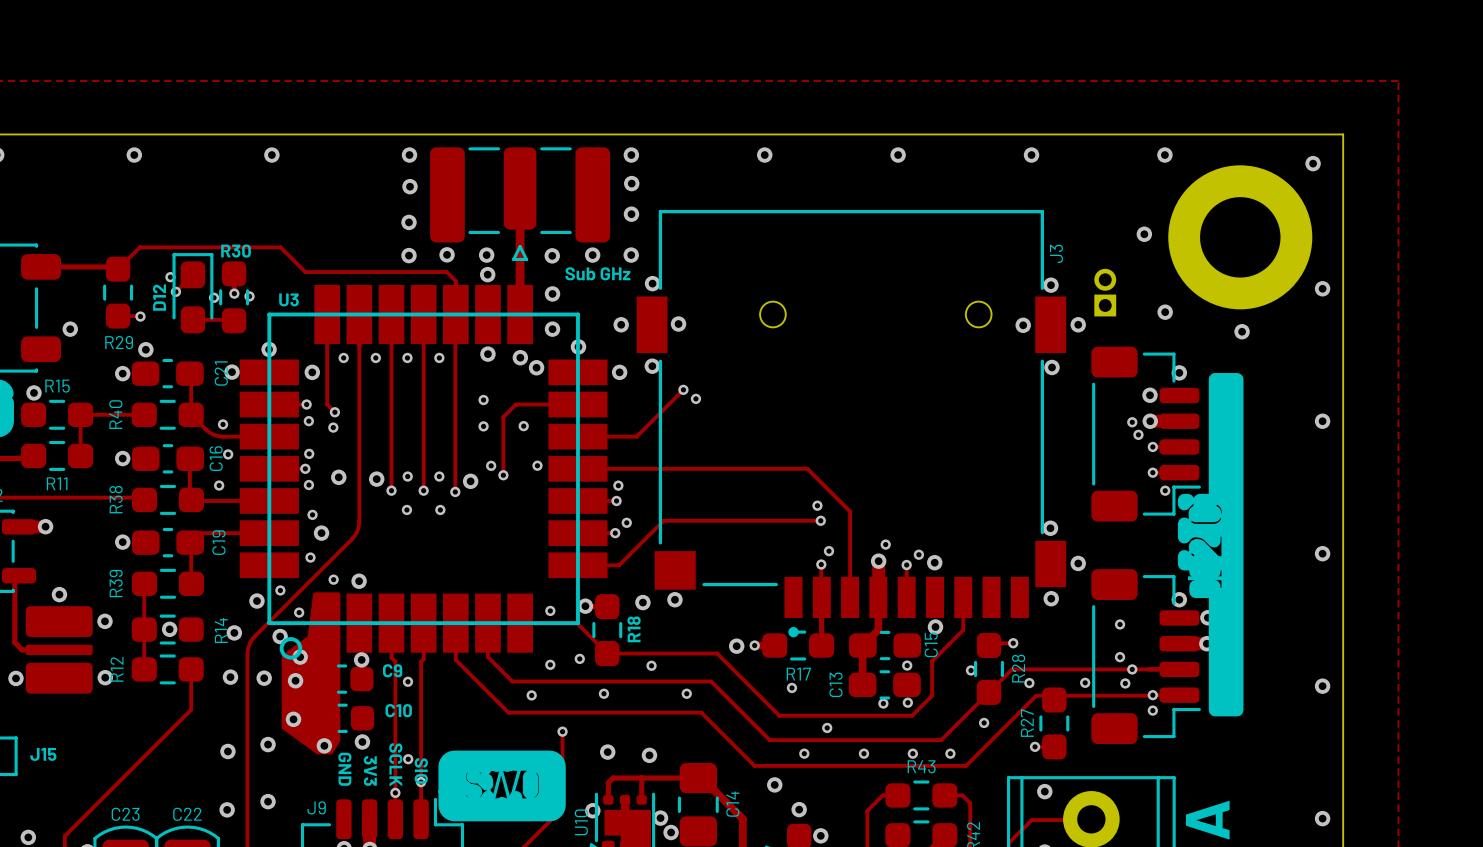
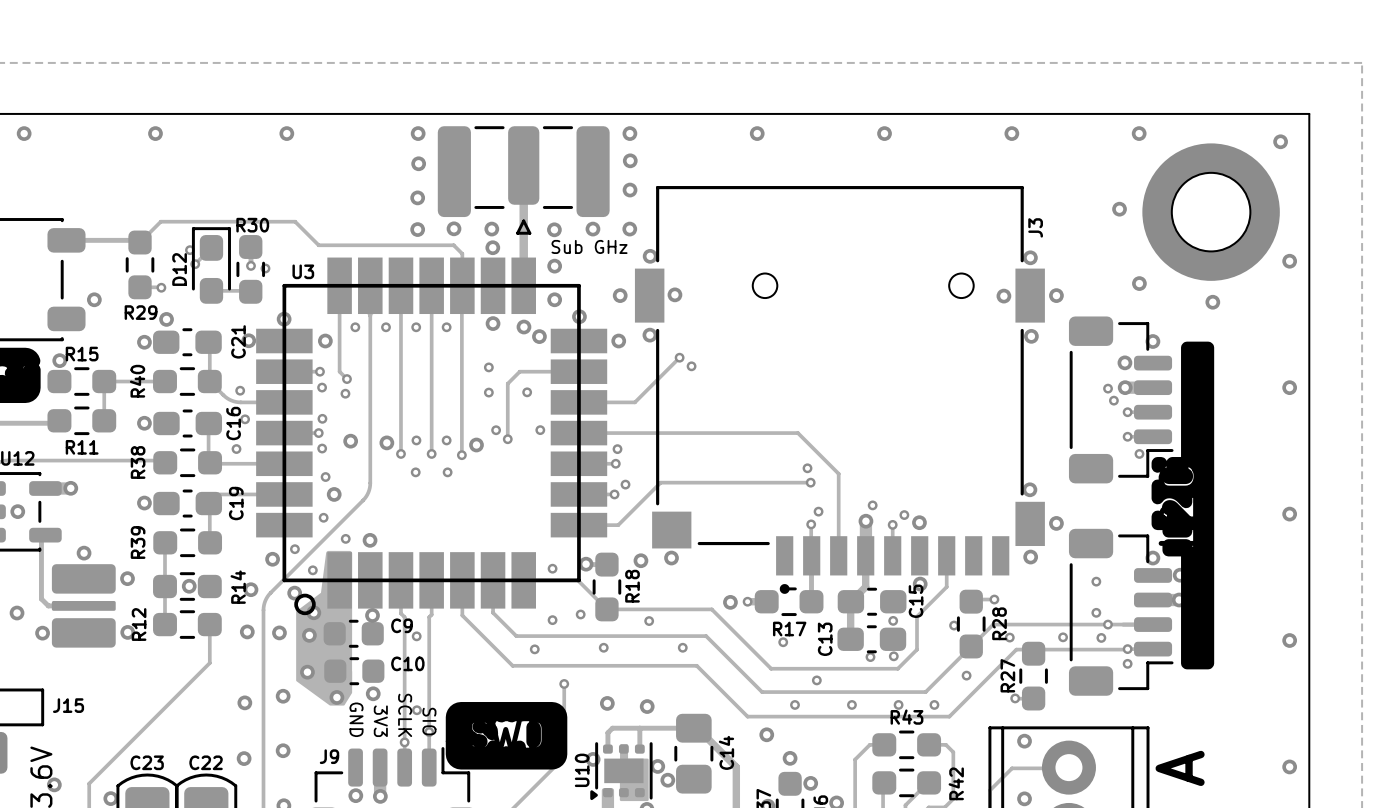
part: (1105, 292) -> none
via: (214, 297) -> none

